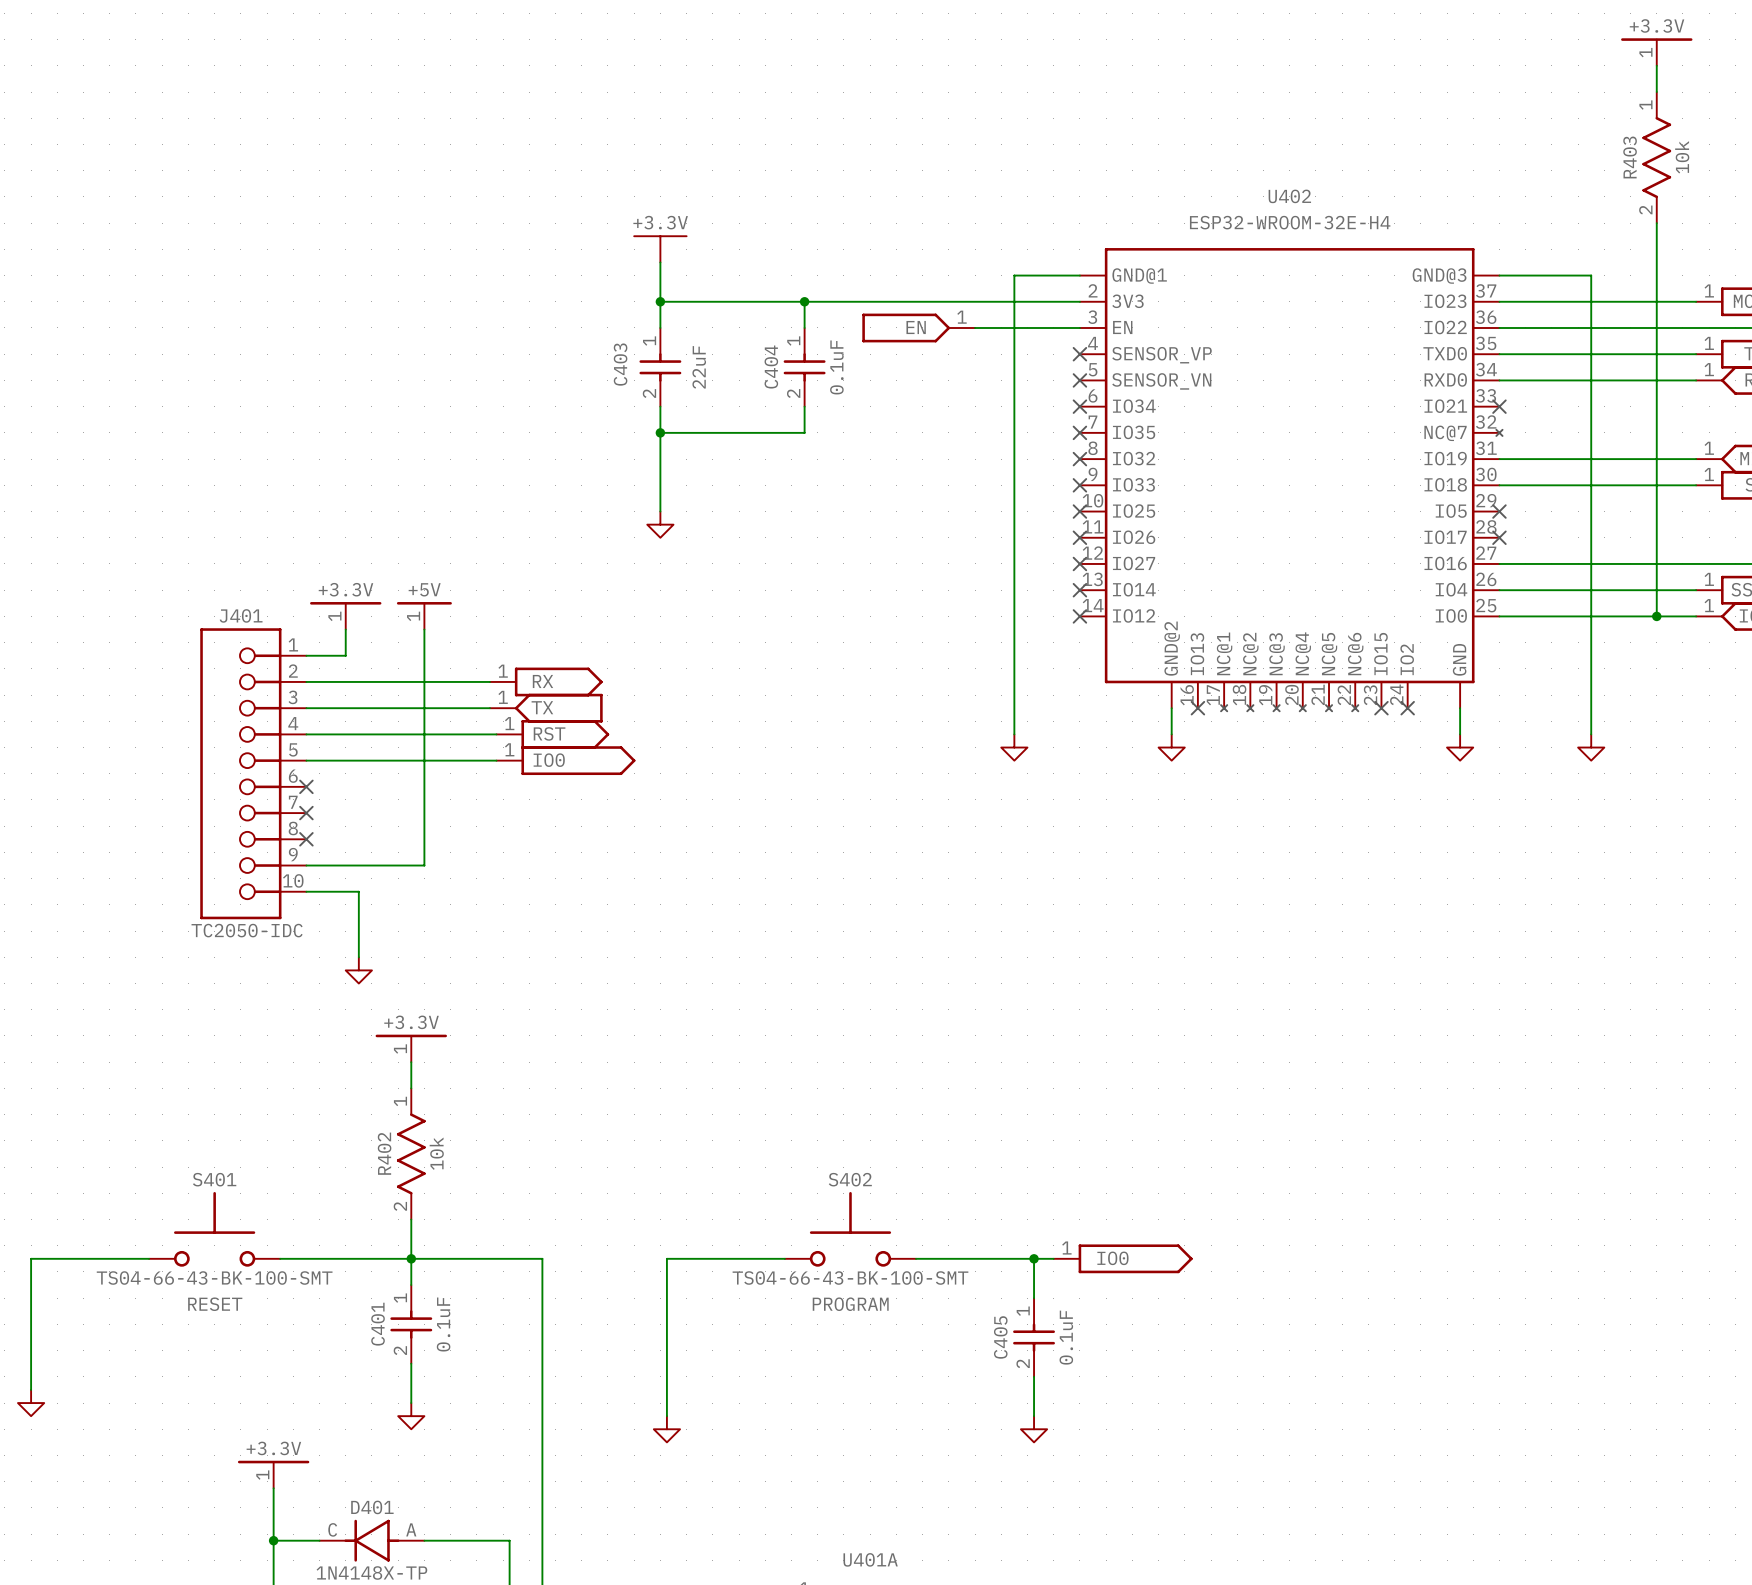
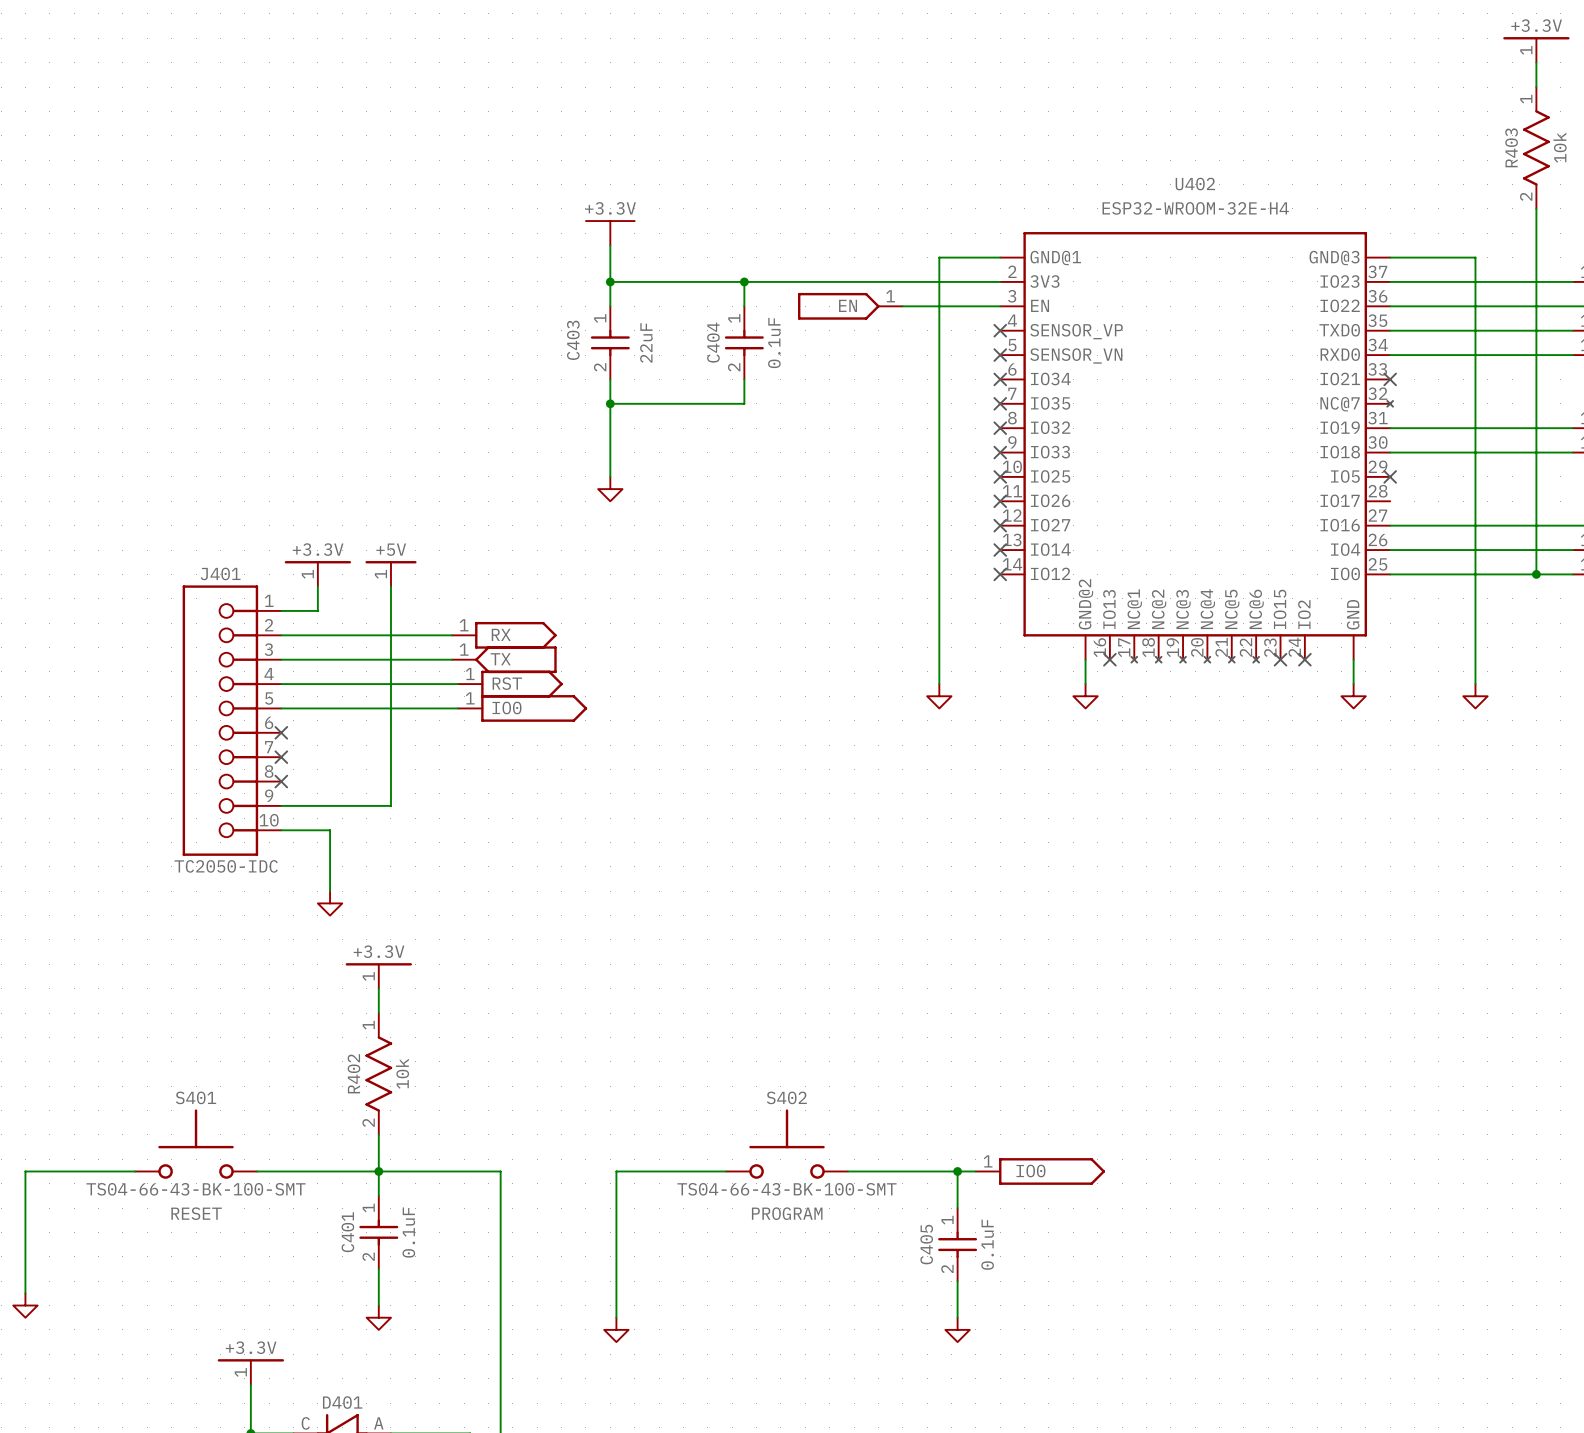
no-connect mark: (1499, 537) -> none

